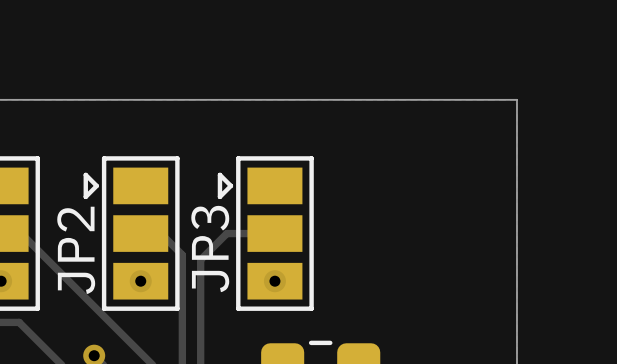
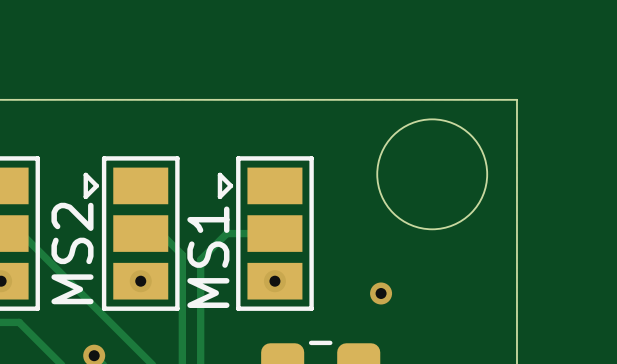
round board edge: none -> [376, 118, 489, 231]
JP3 name: JP3 (210, 249) -> none
JP2 name: JP2 (76, 250) -> none
JP2 value: none -> MS2 (72, 253)
JP3 value: none -> MS1 (208, 257)
via: none -> (381, 293)

